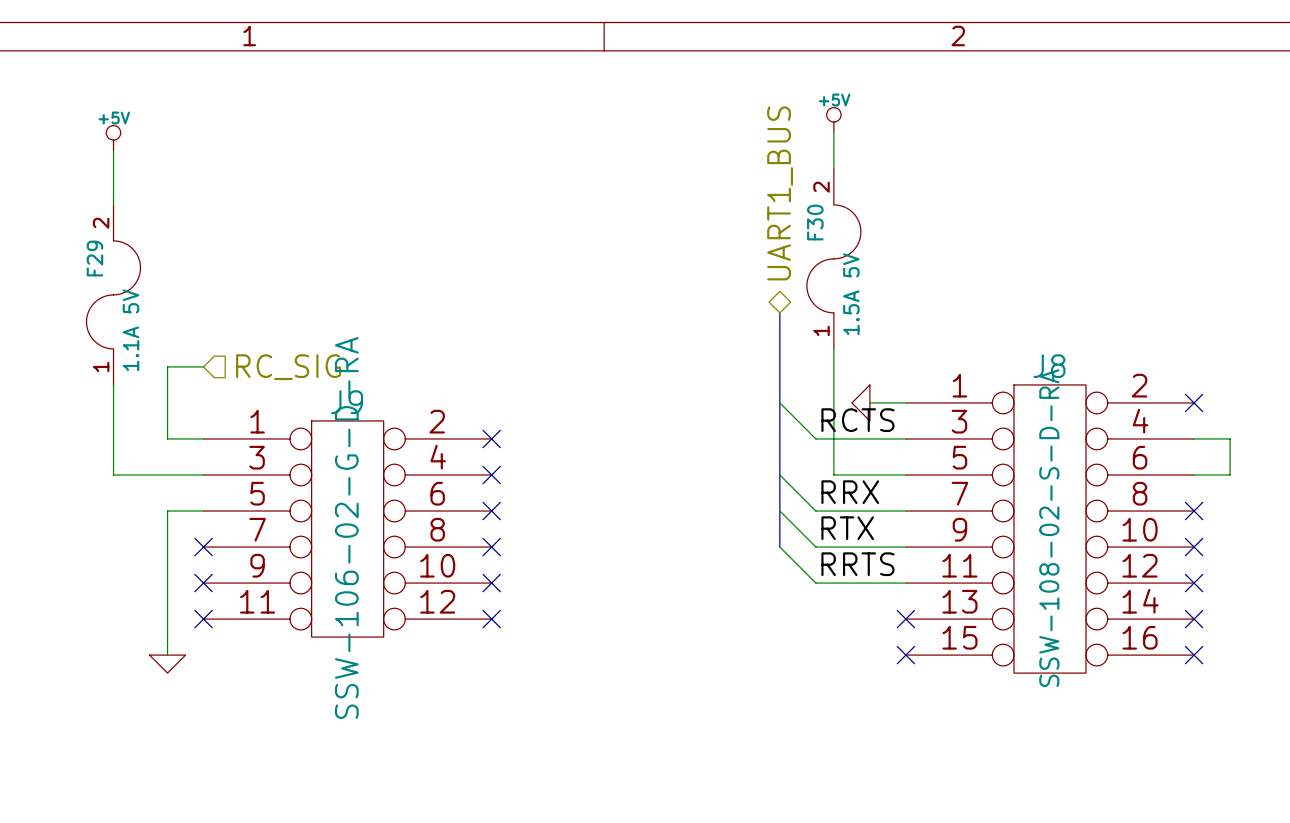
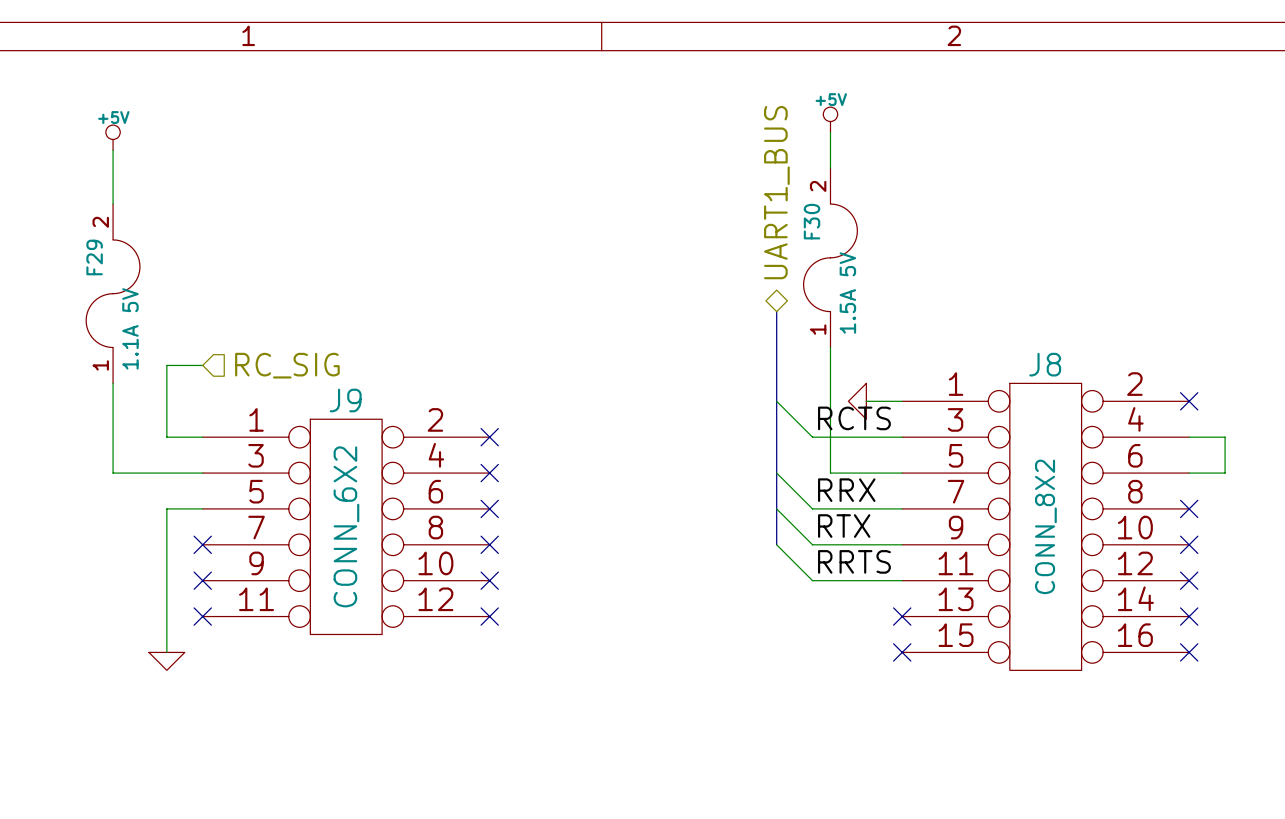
J9 value: SSW-106-02-G-D-RA (346, 528) -> CONN_6X2 (346, 526)
J8 value: SSW-108-02-S-D-RA (1049, 528) -> CONN_8X2 (1045, 526)

